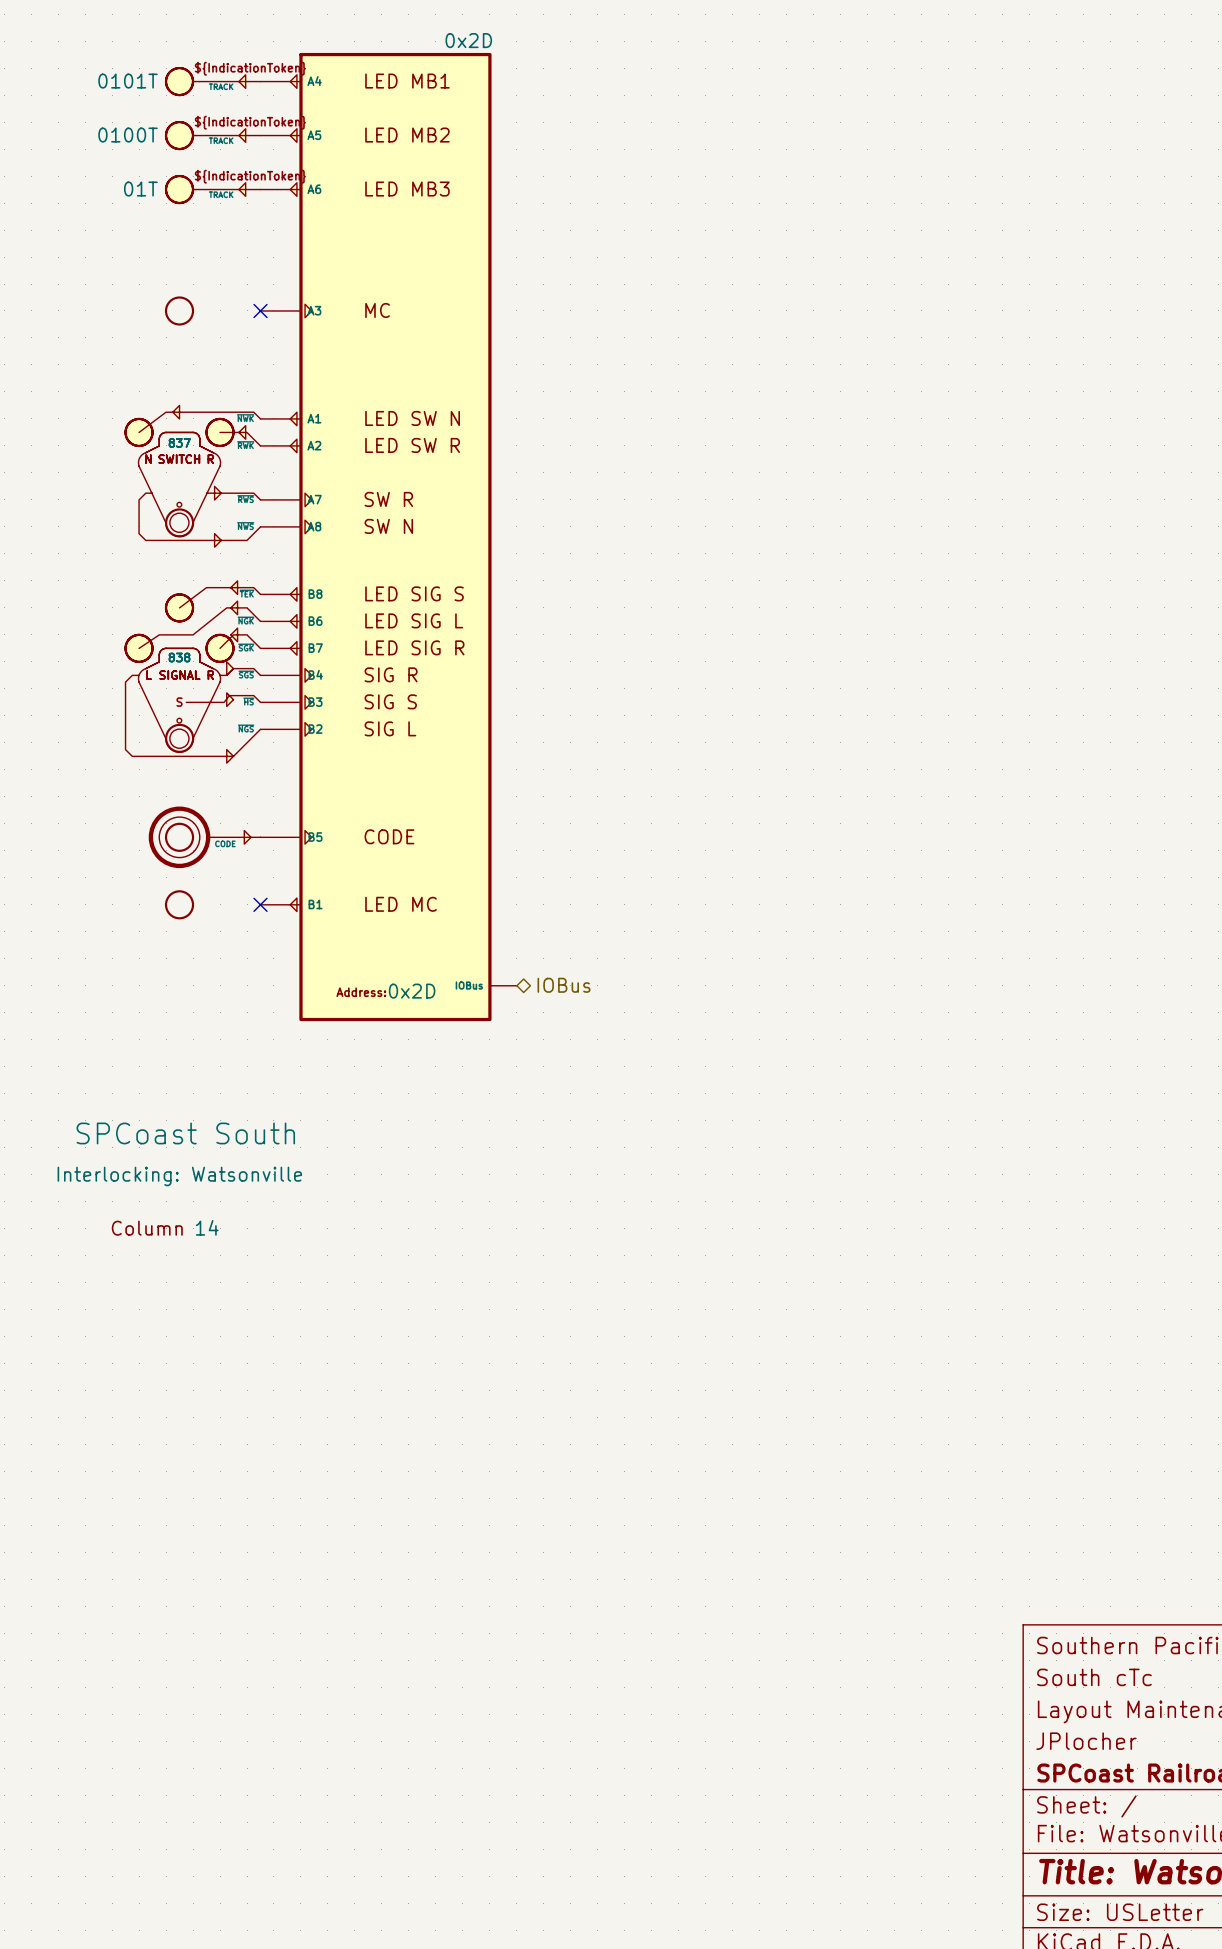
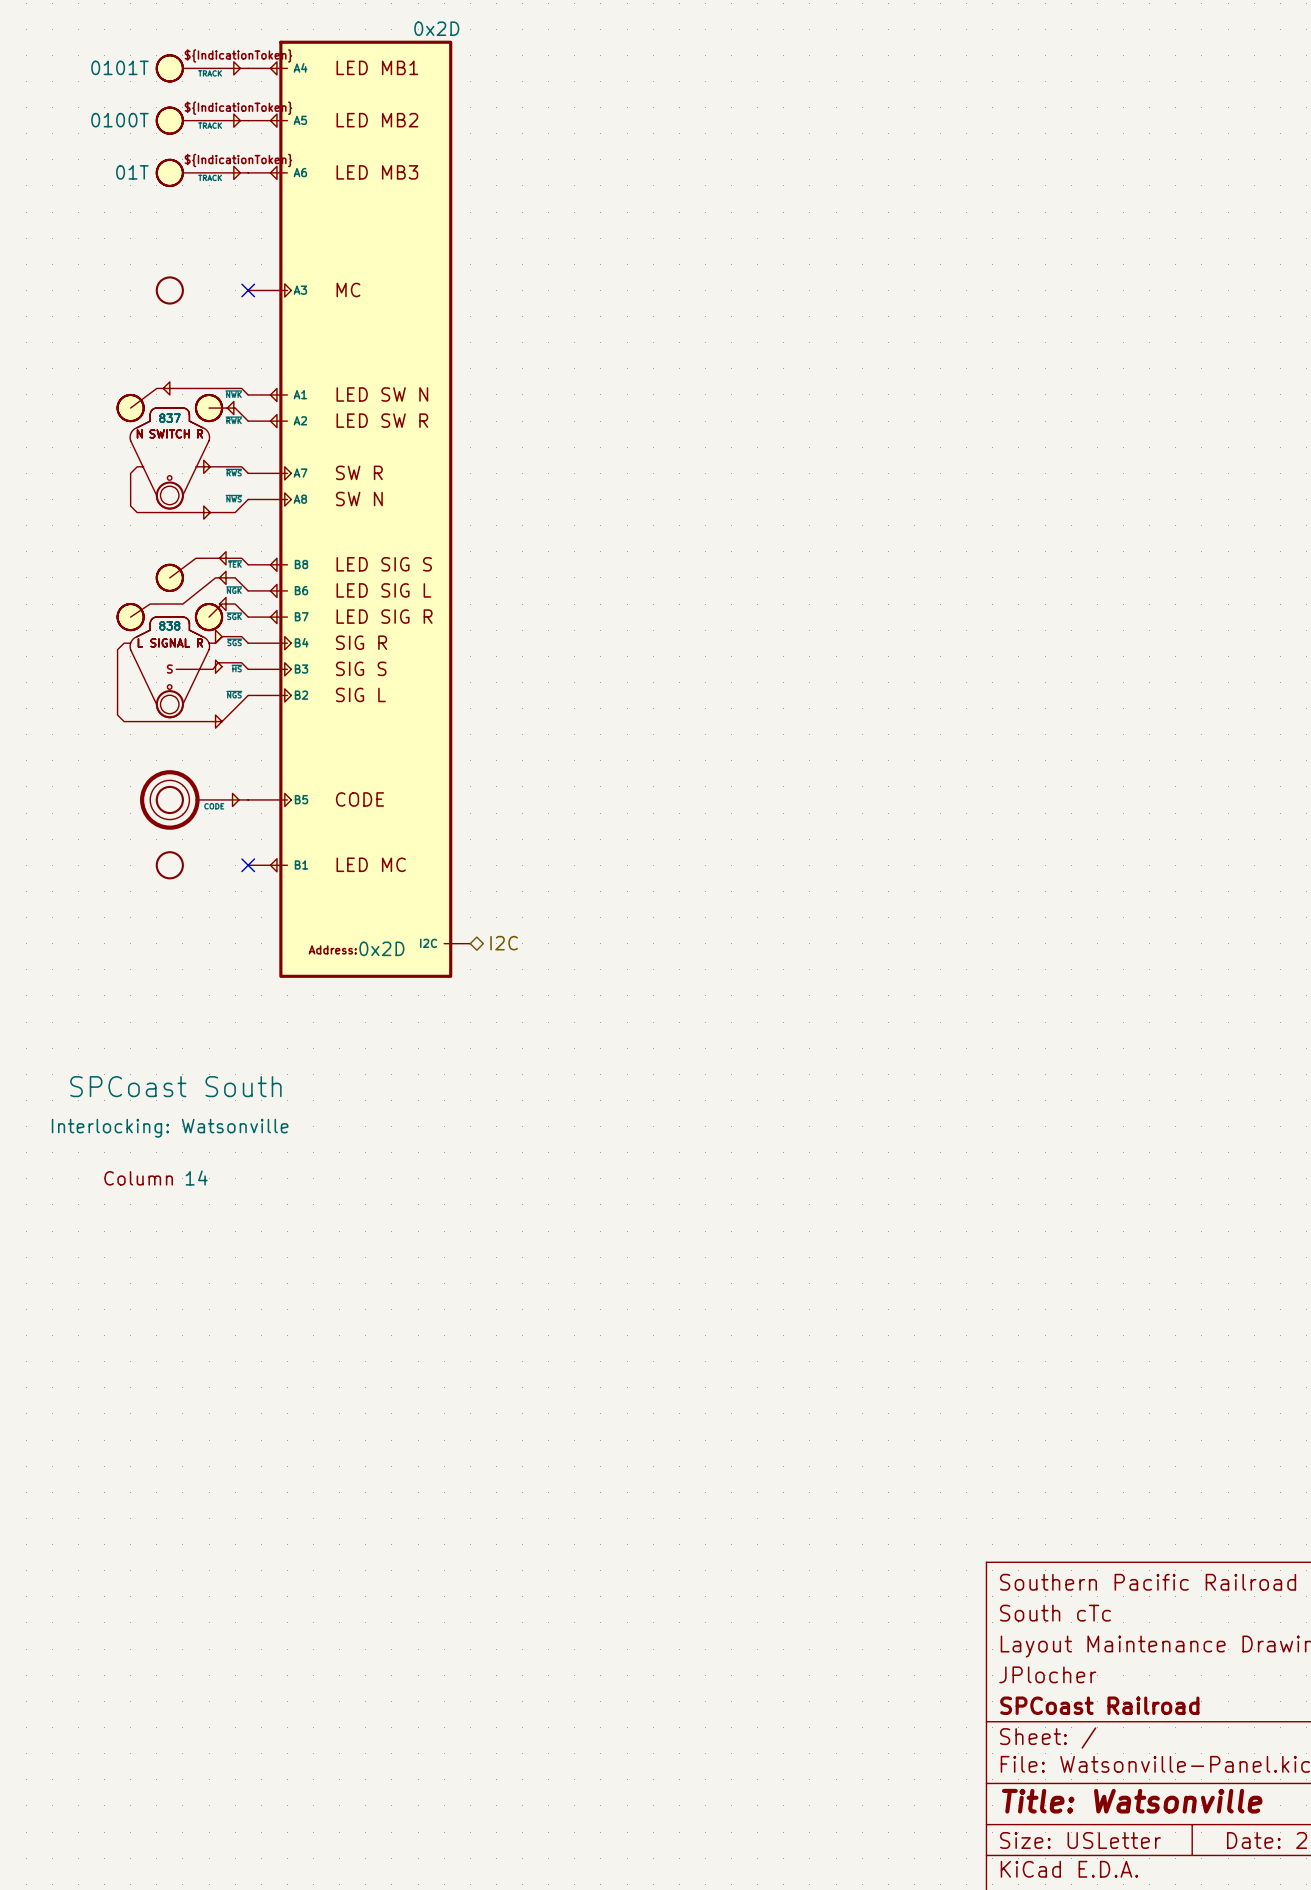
part symbol: [164, 66, 261, 97] -> [155, 54, 249, 83]
part symbol: [164, 120, 261, 151] -> [155, 106, 249, 135]
part symbol: [164, 174, 261, 205] -> [155, 158, 249, 188]
part: none -> 0x2D (359, 509)
part: 0x2D (388, 537) -> none
hierarchical label: none -> I2C (504, 943)
hierarchical label: IOBus (564, 985) -> none

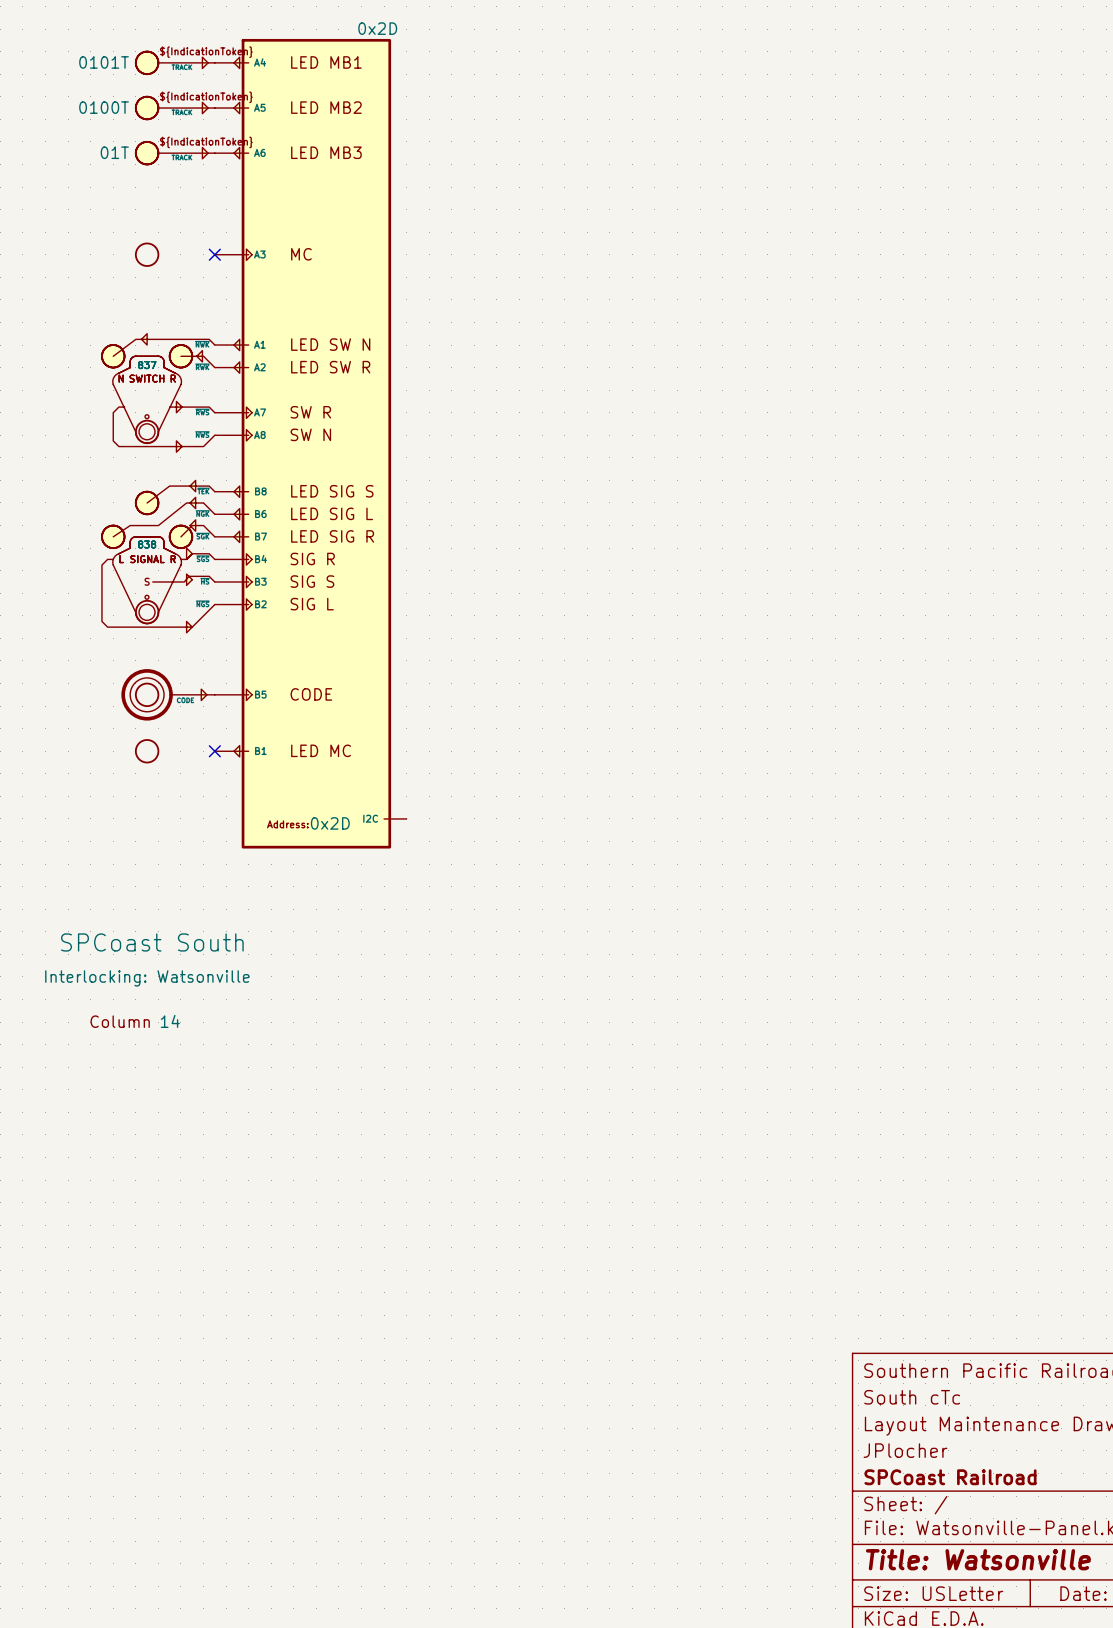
hierarchical label: I2C (504, 943) -> none

